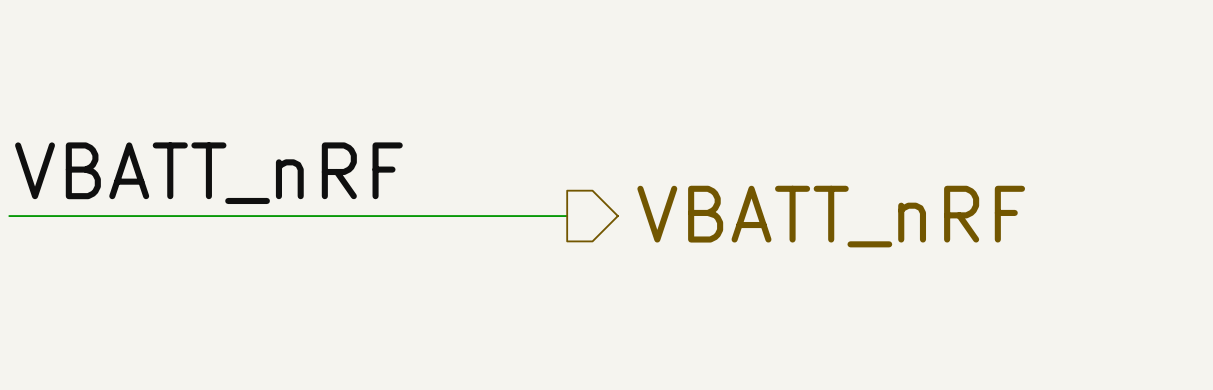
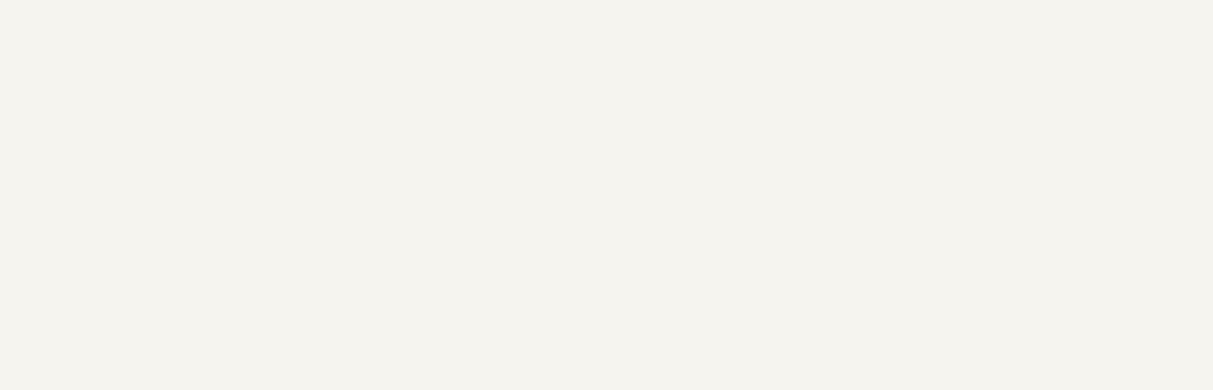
label: VBATT_nRF (208, 173) -> none
wire: (9, 216) (567, 216) -> none
hierarchical label: VBATT_nRF (831, 216) -> none

